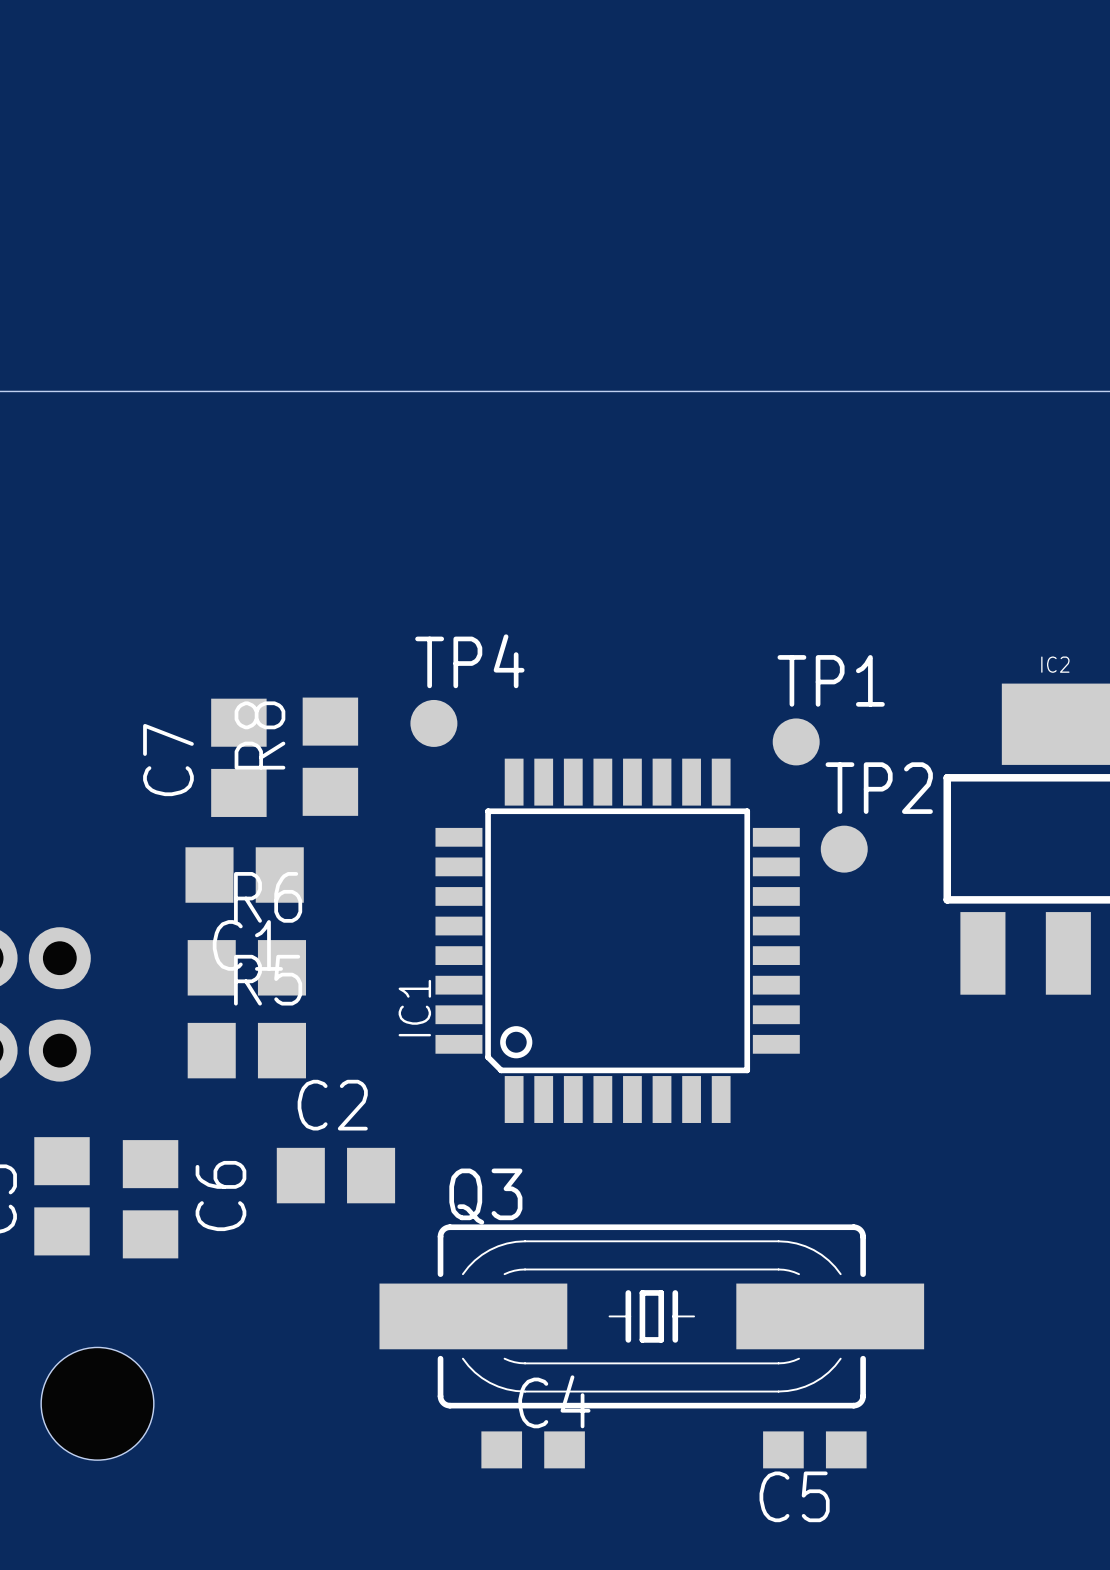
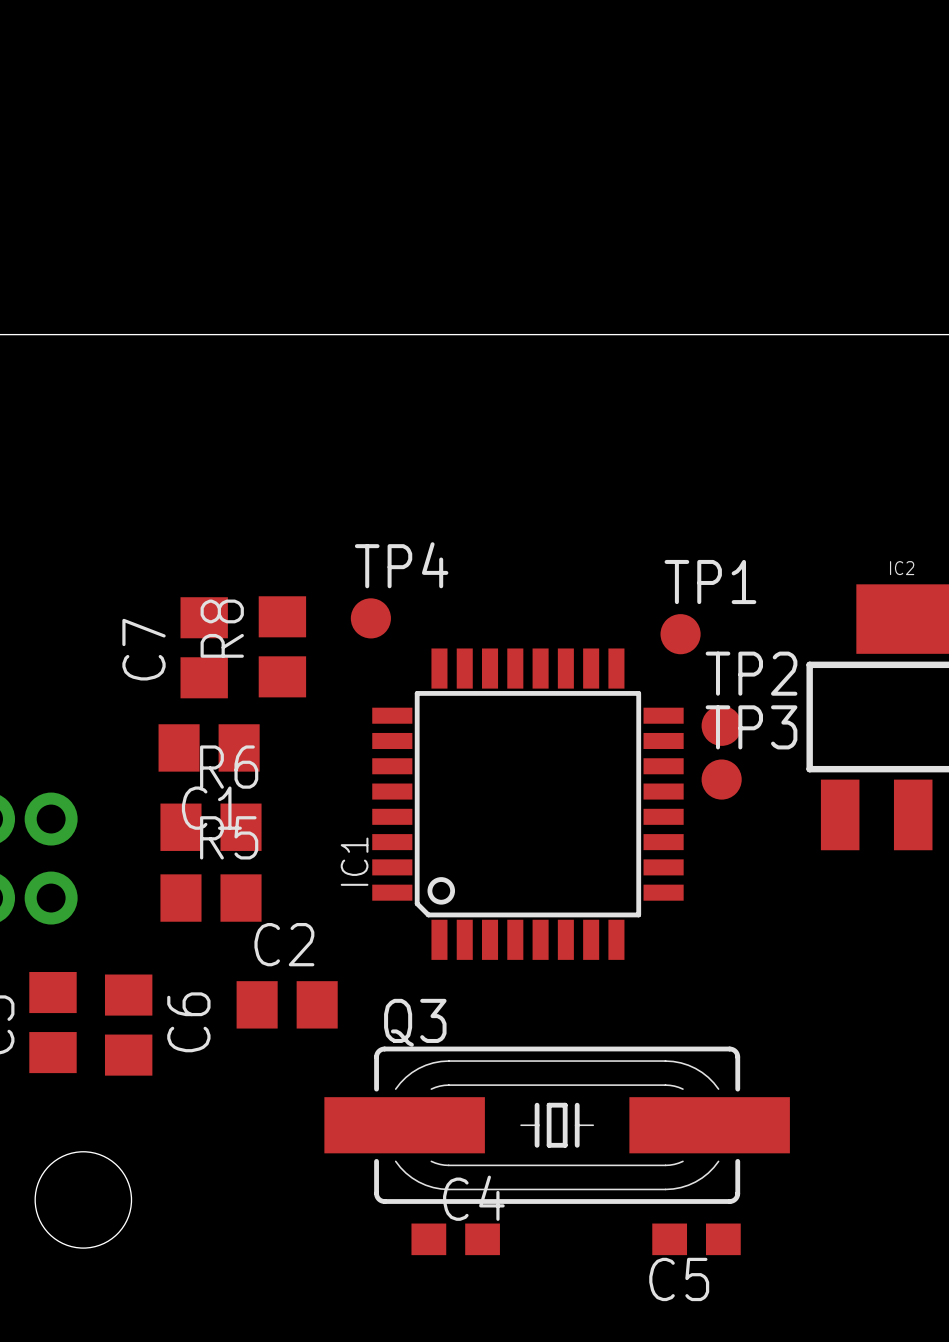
TP3: none -> (721, 779)

